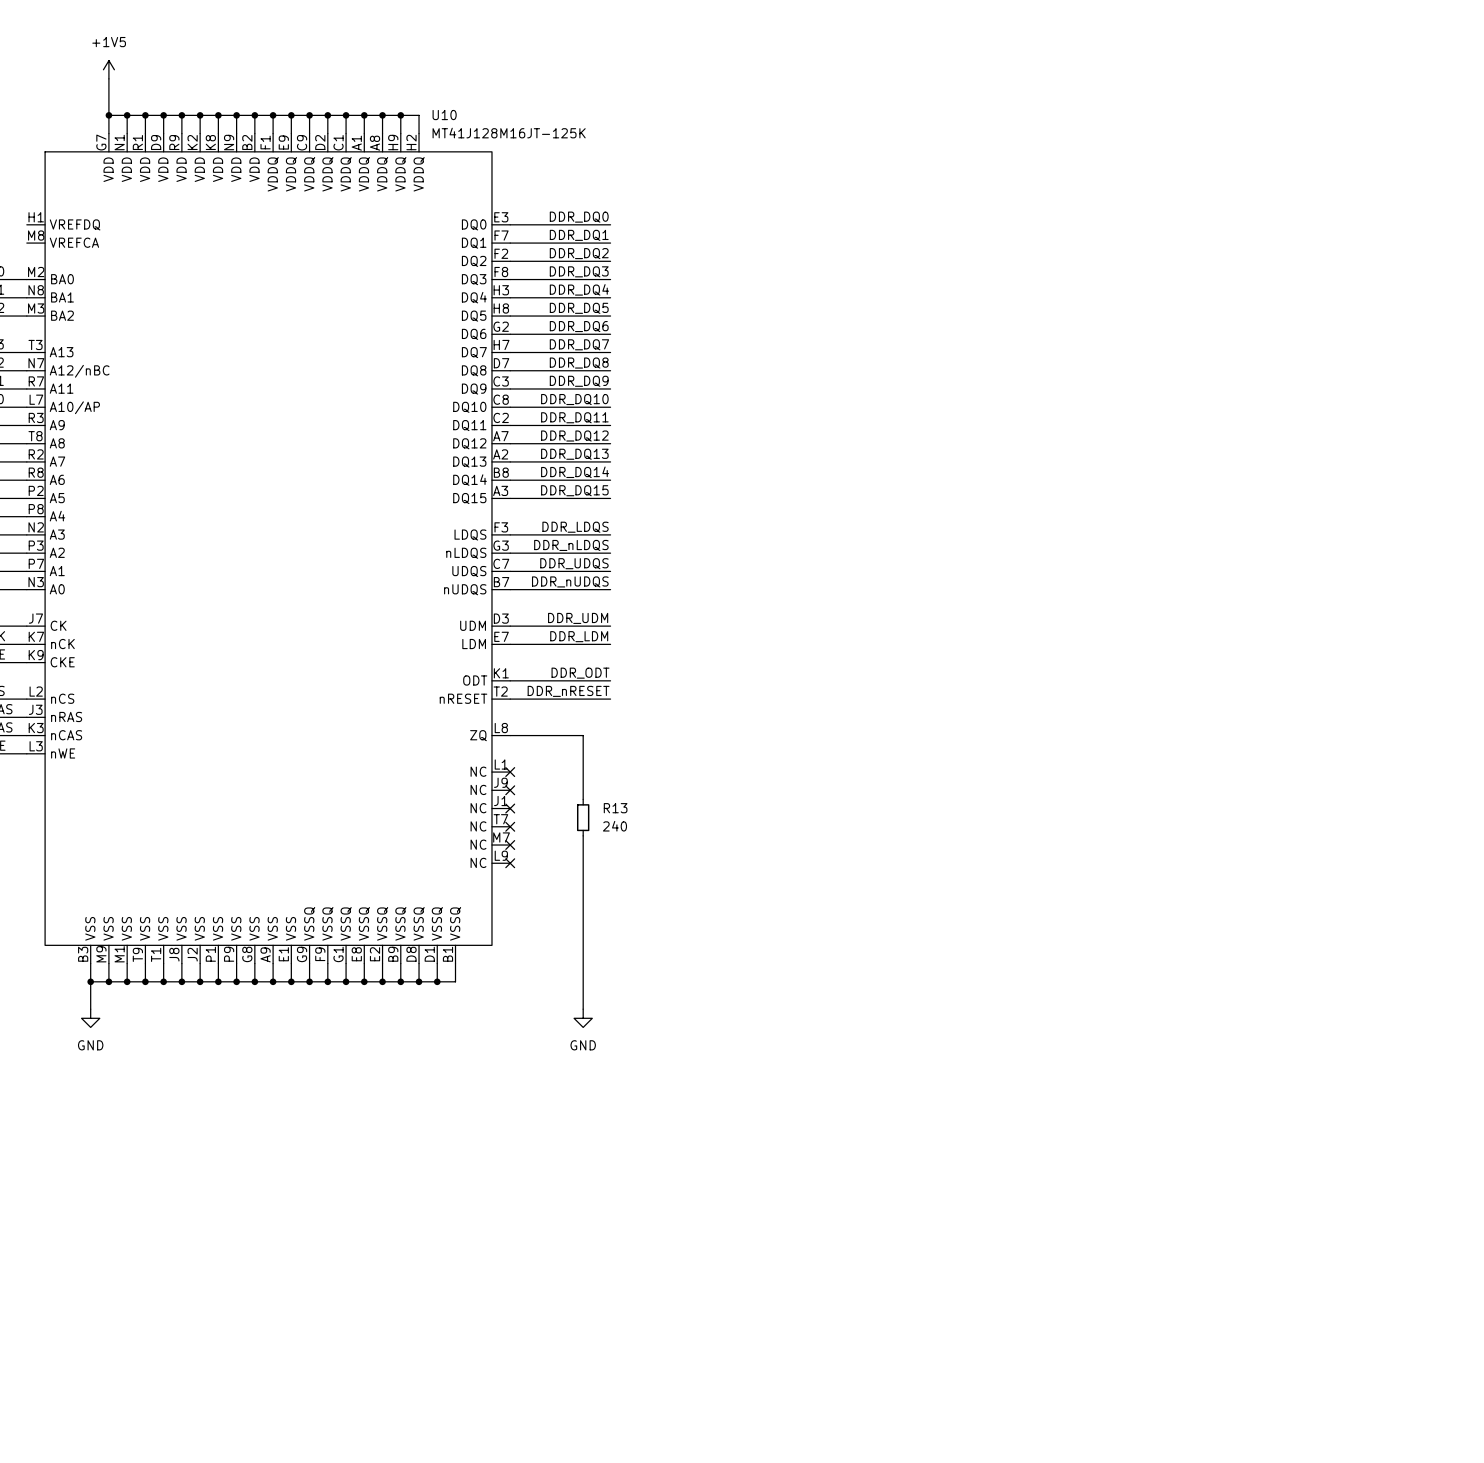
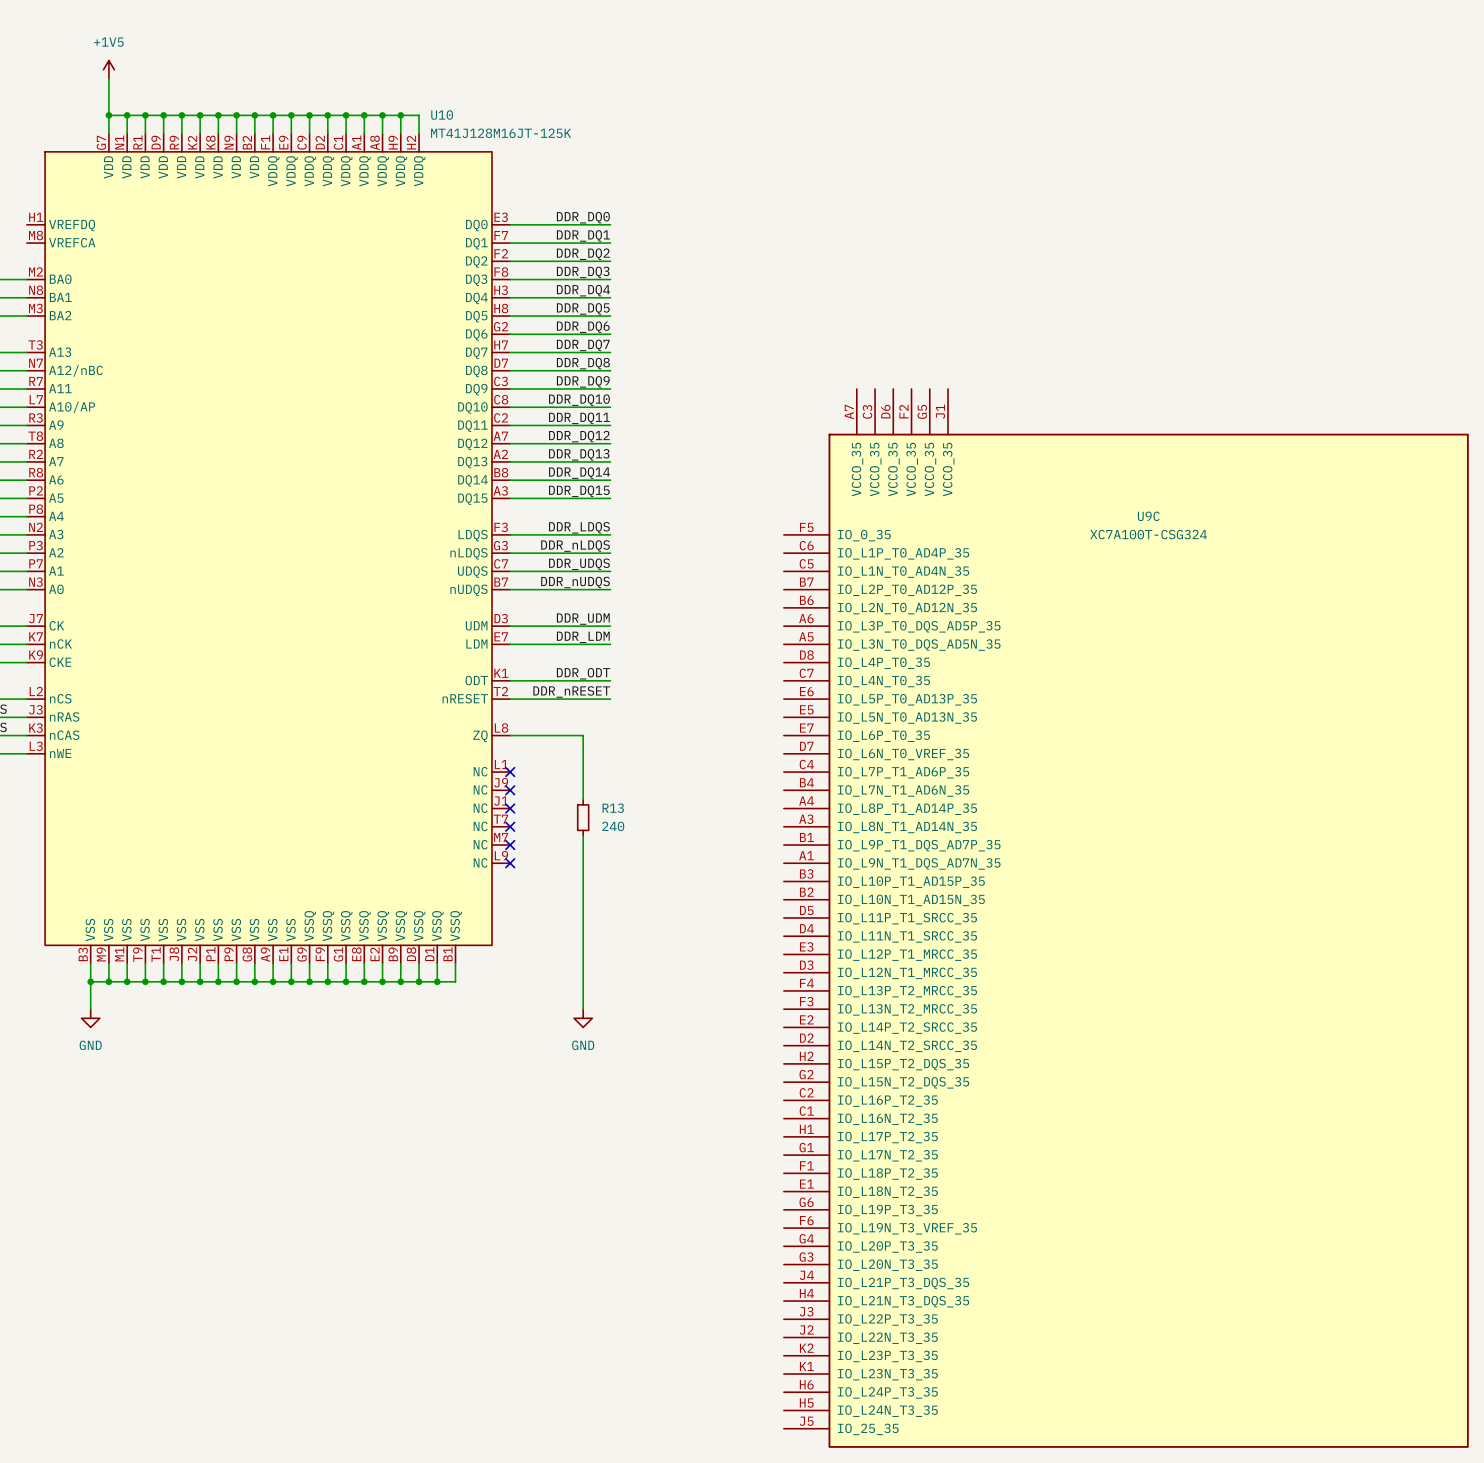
U9C: none -> XC7A100T-CSG324 (1126, 918)

